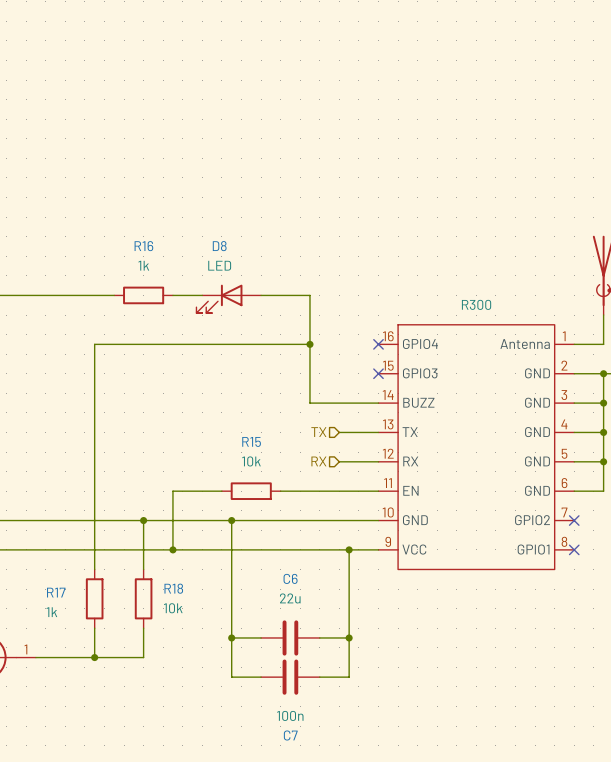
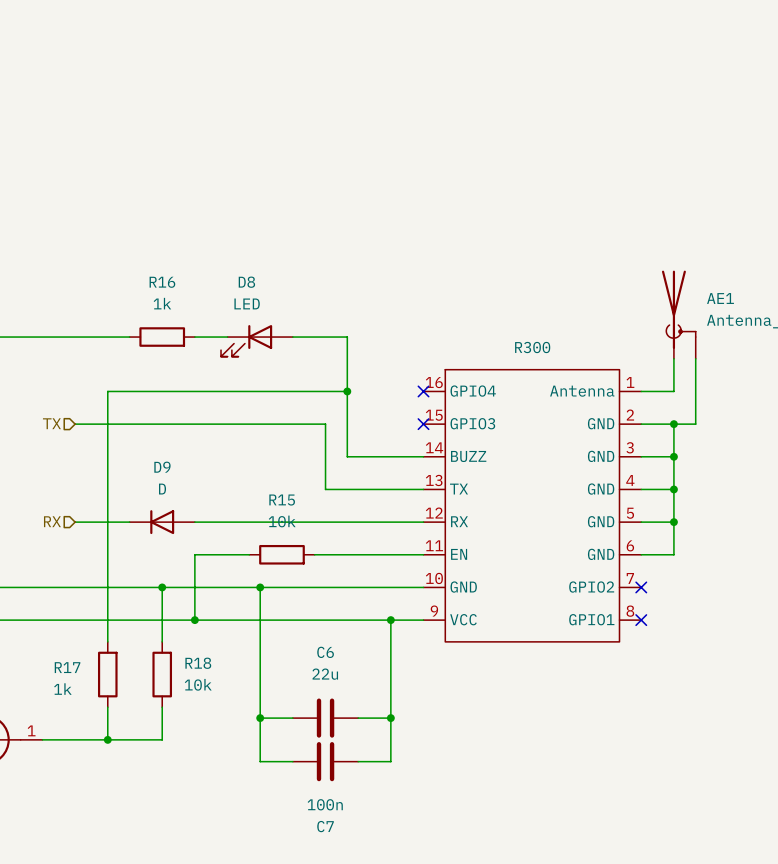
hierarchical label: none -> TX (51, 423)
wire: none -> (75, 424) (325, 424) (325, 489) (379, 489)
hierarchical label: TX (318, 432) -> none
hierarchical label: none -> RX (52, 521)
wire: none -> (75, 522) (129, 522)
D9: none -> D (162, 522)
wire: none -> (194, 522) (379, 522)
hierarchical label: RX (318, 461) -> none

